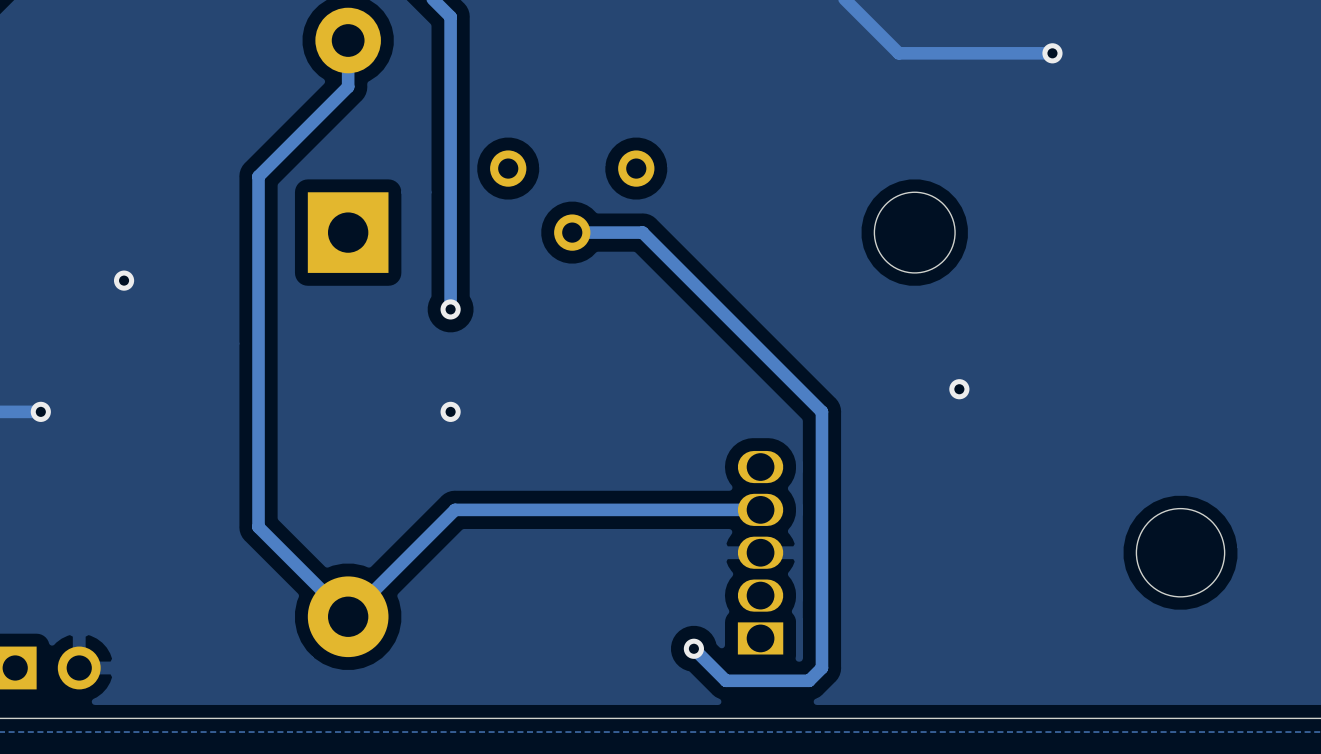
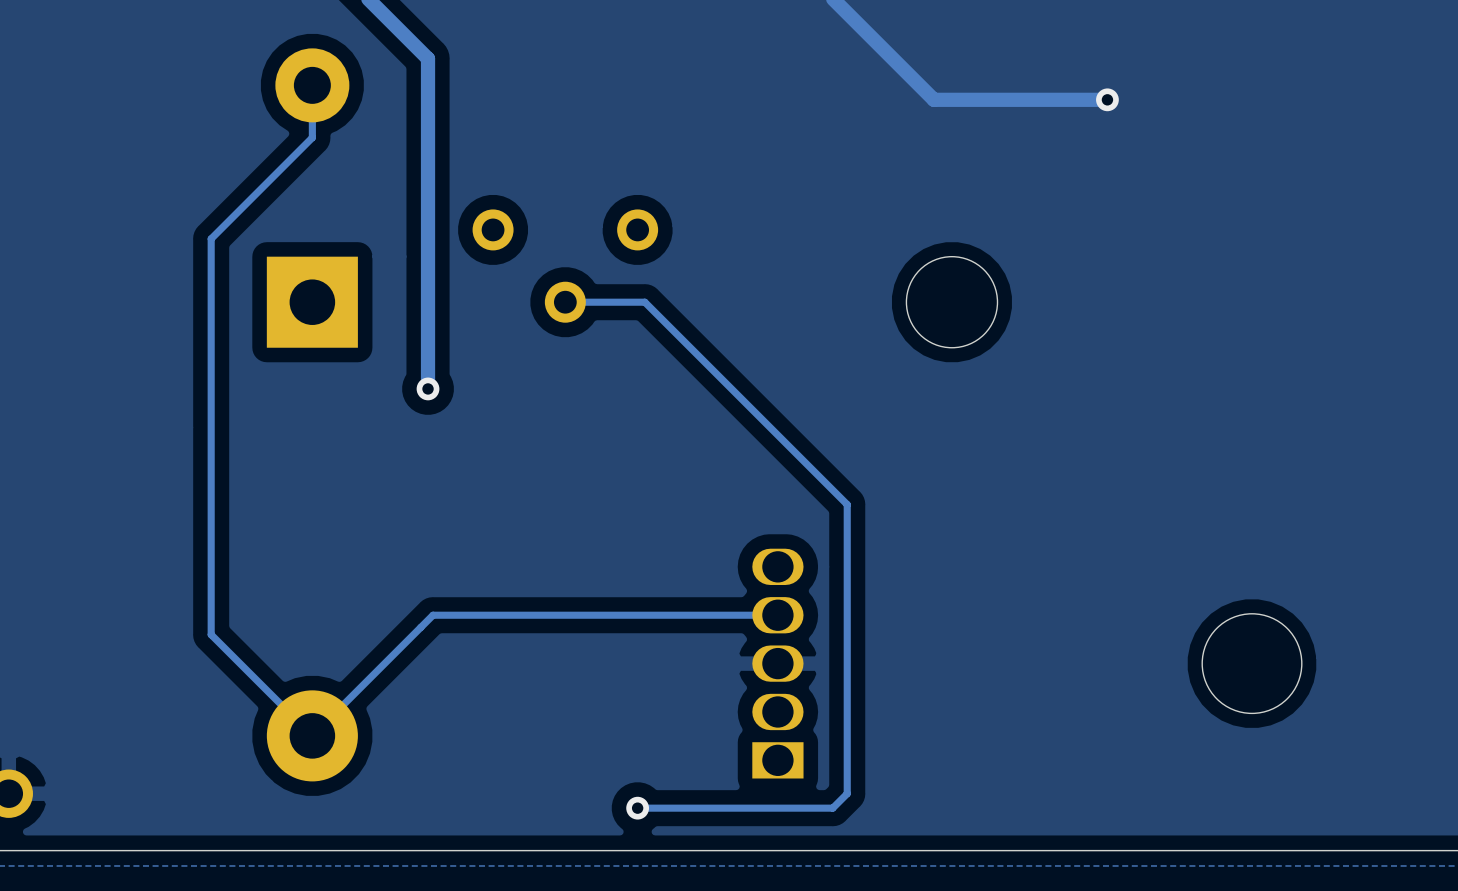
track width: thick (348, 40) (348, 86) (258, 176) (258, 527) (348, 616) (455, 509) (760, 509) -> thin (312, 85) (312, 137) (211, 238) (211, 634) (312, 735) (433, 615) (777, 615)
track width: thick (572, 232) (642, 232) (821, 411) (821, 667) (809, 680) (725, 680) -> thin (565, 302) (644, 302) (847, 504) (847, 793) (832, 808) (738, 808)
via: (124, 280) -> none
via: (959, 389) -> none
via: (450, 411) -> none
track: (693, 648) (725, 680) -> (637, 808) (738, 808)
via position: (693, 648) -> (637, 808)

